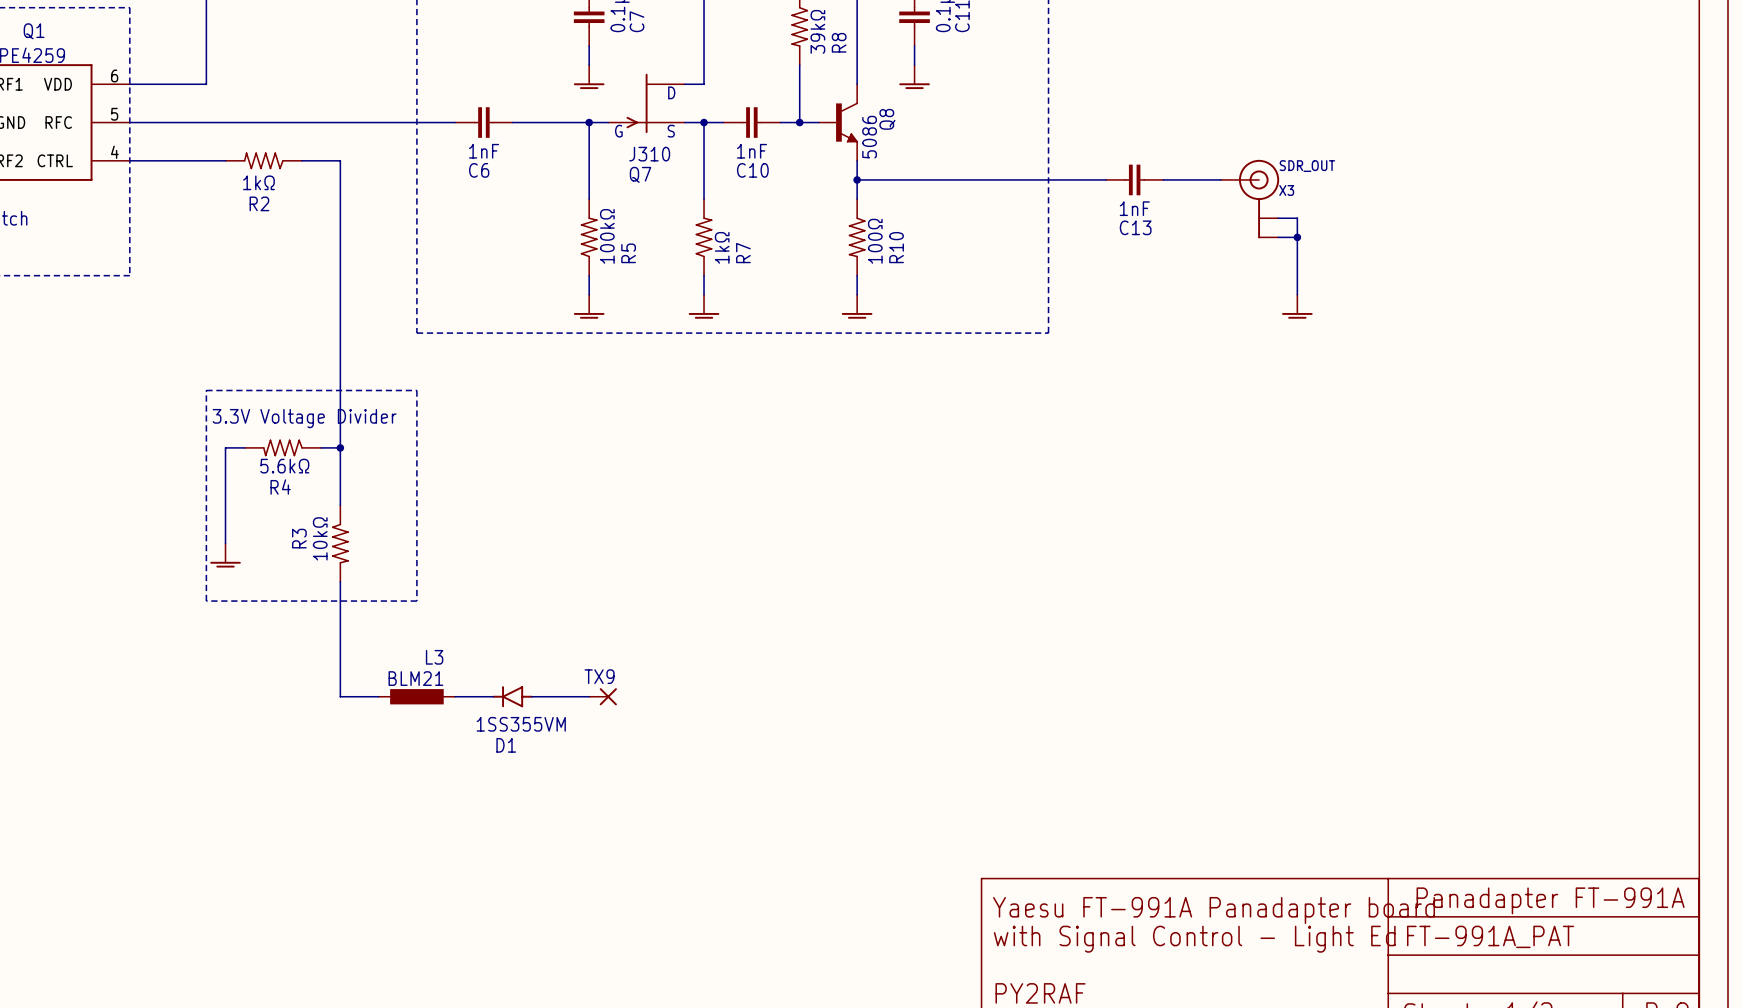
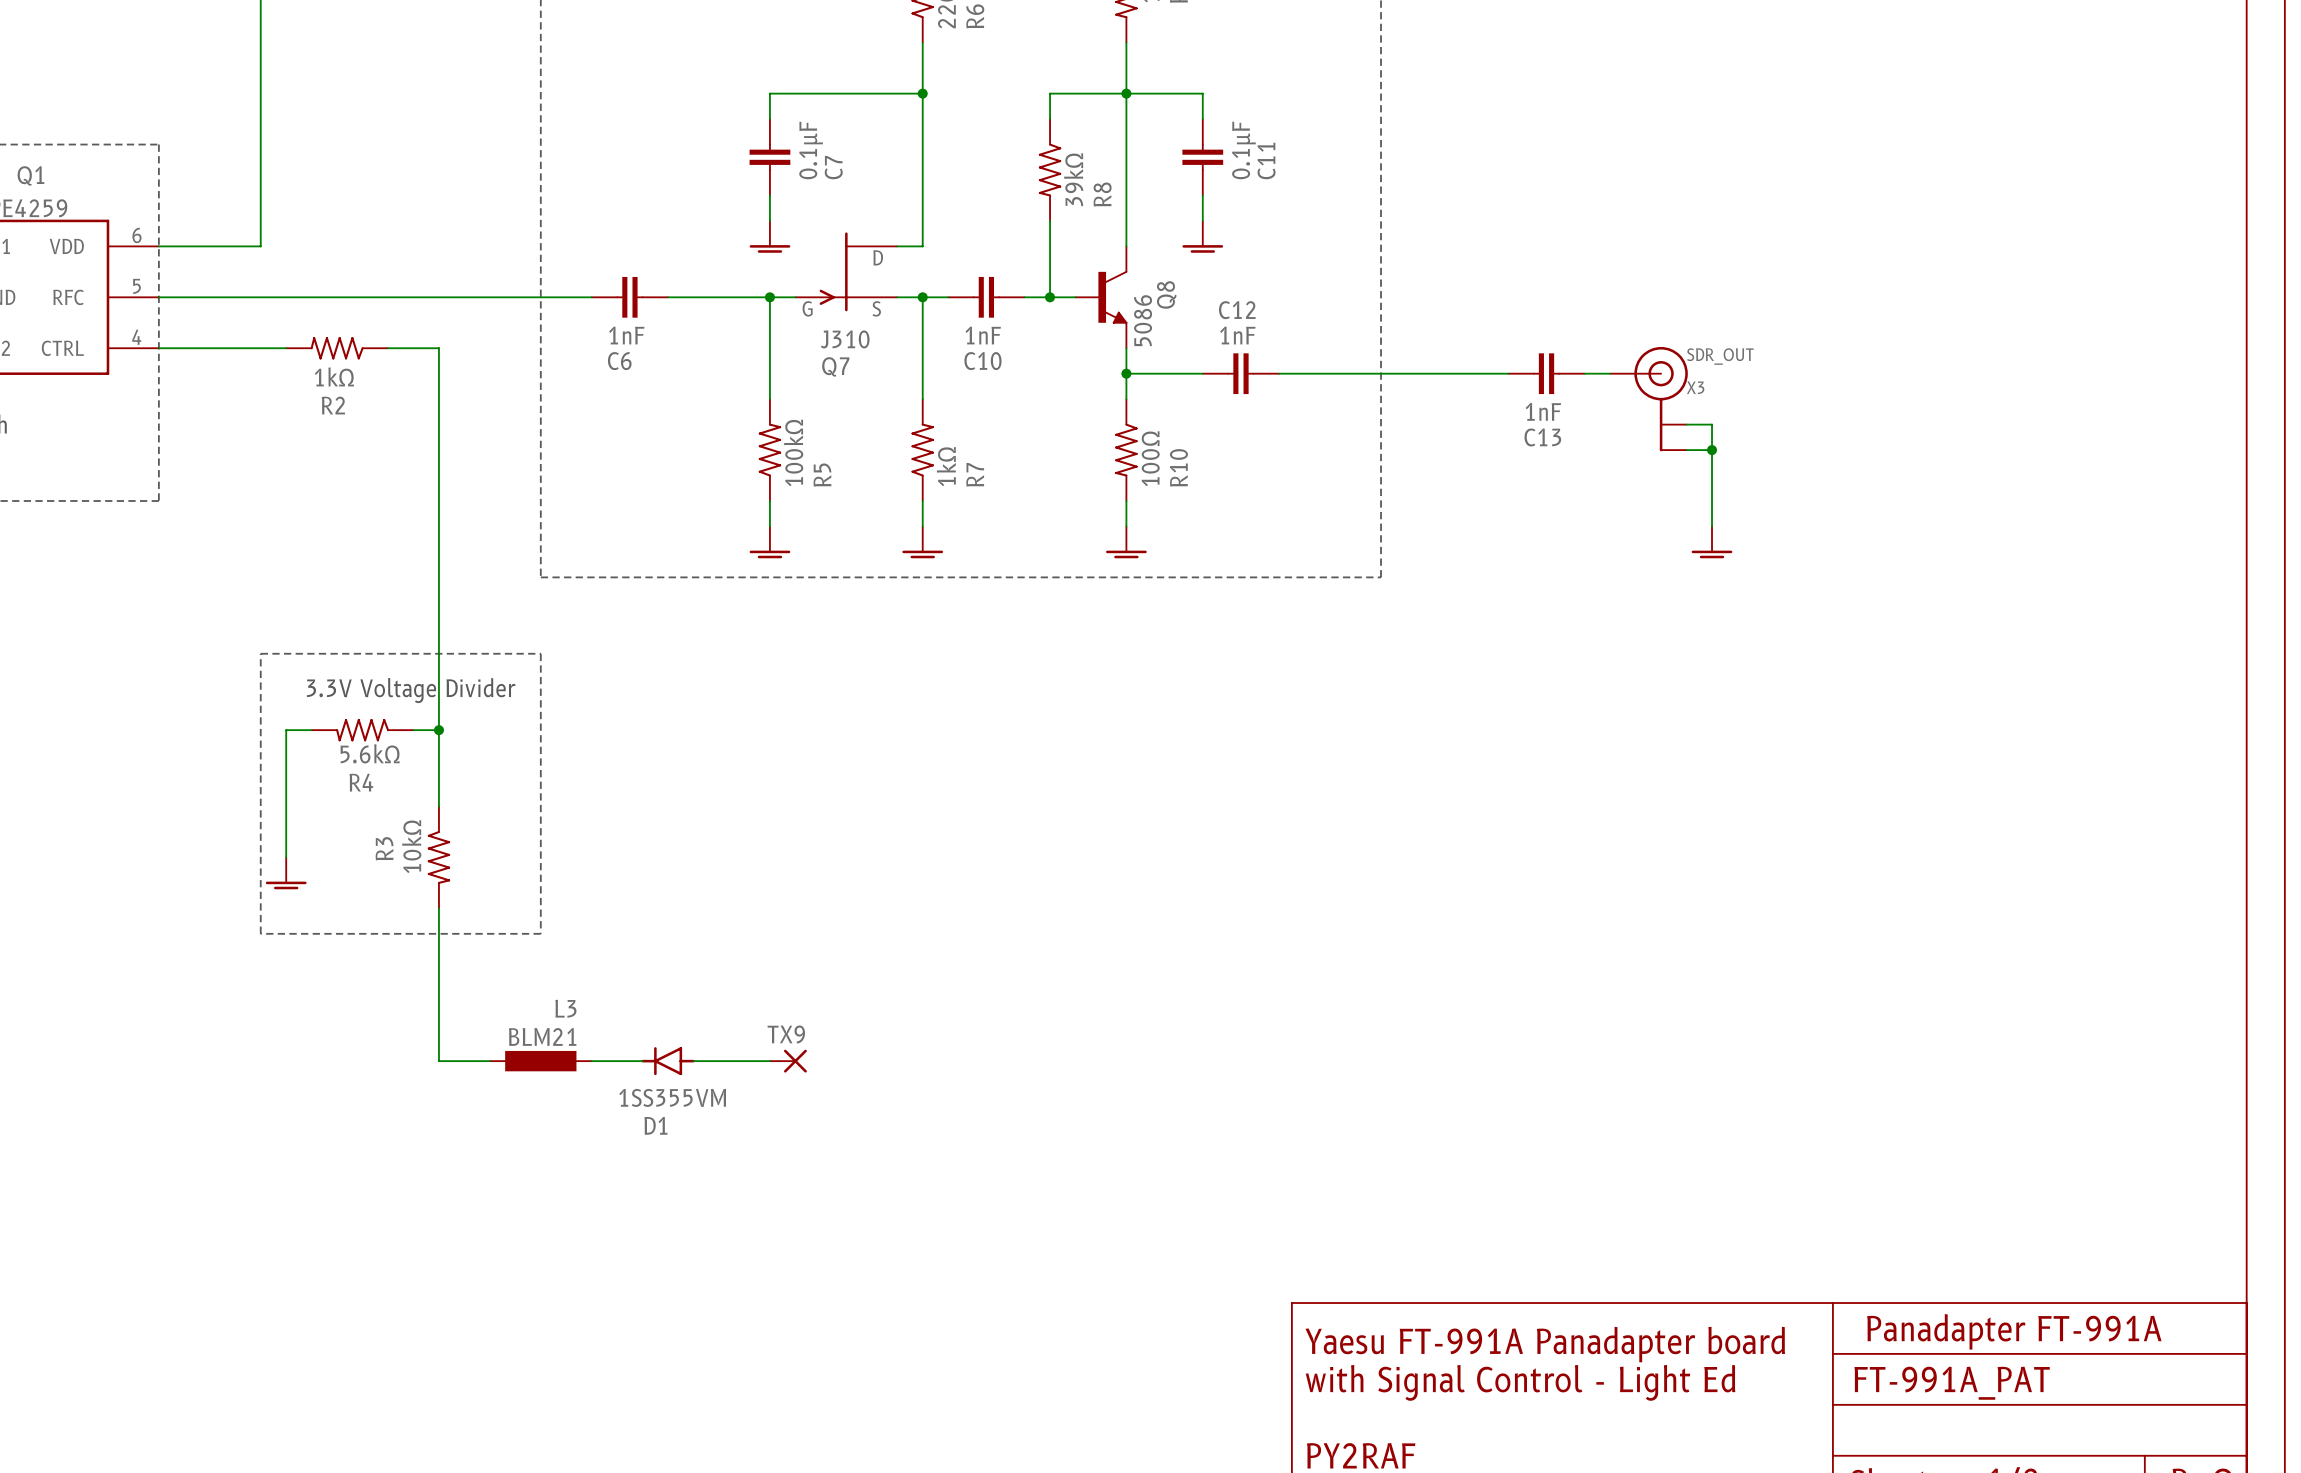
C12: none -> 1nF (1240, 373)
C13 position: (1134, 179) -> (1546, 373)

